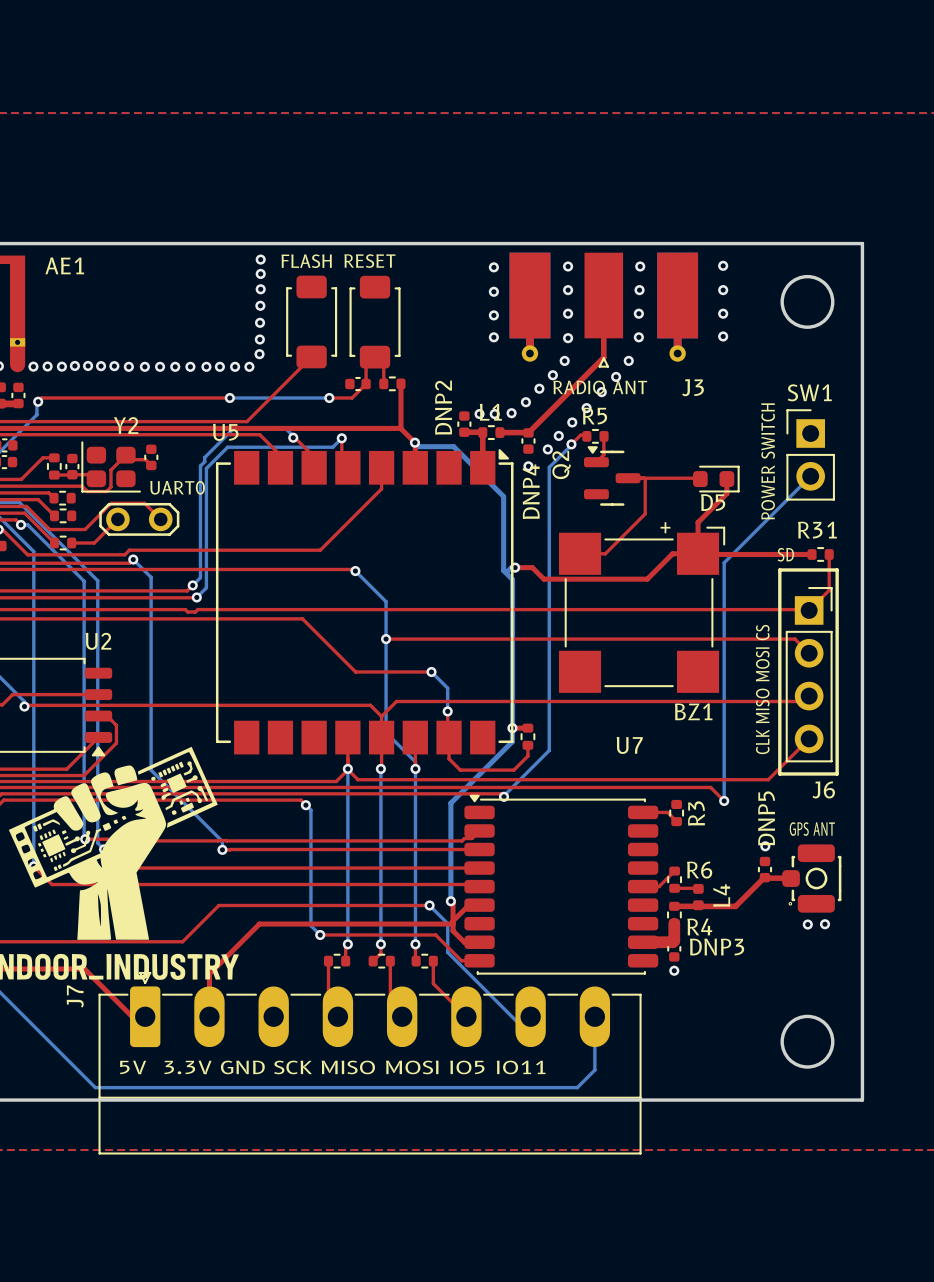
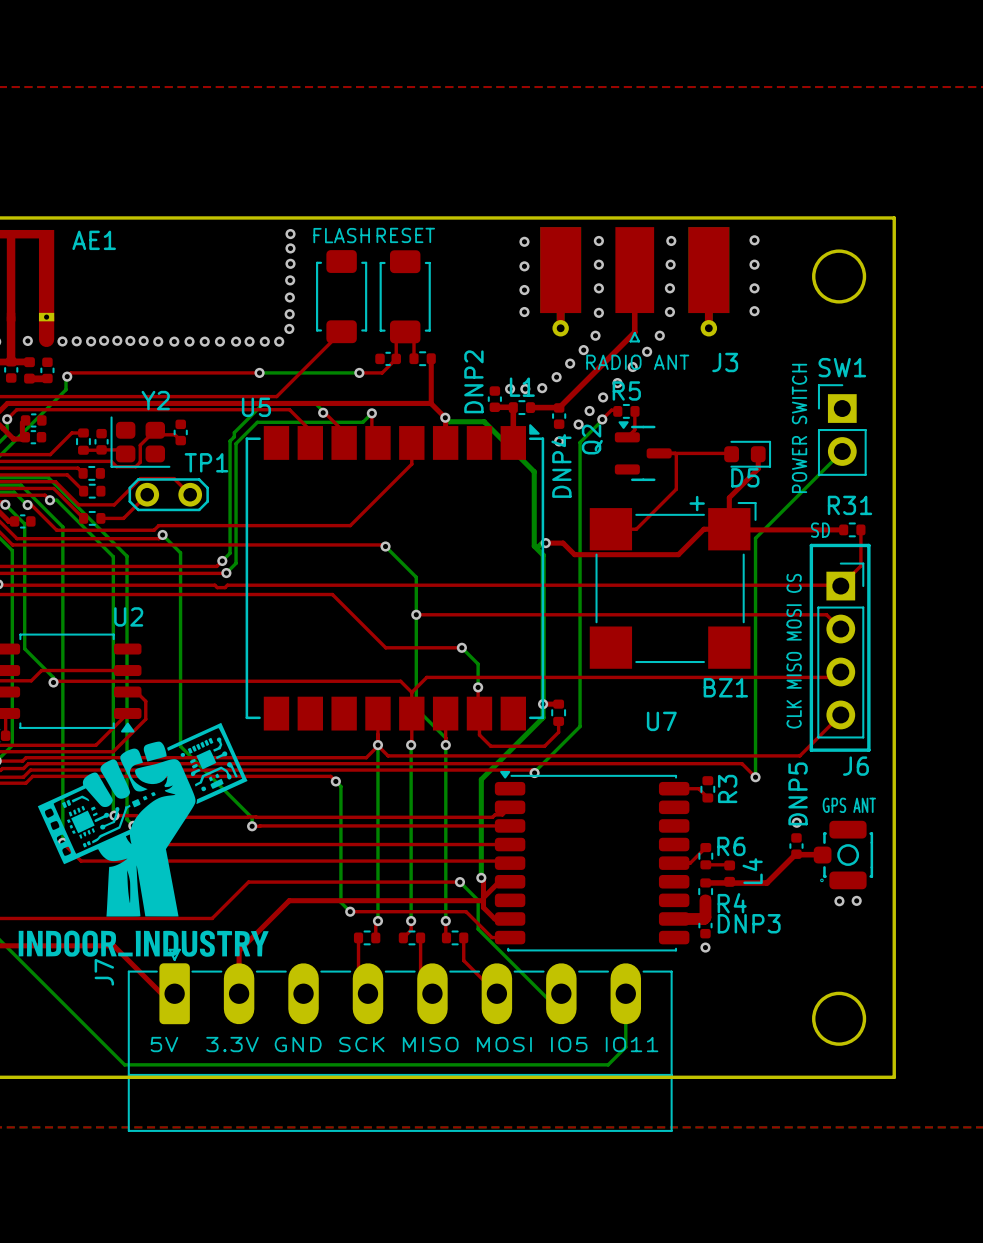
UART0 name: UART0 (177, 487) -> TP1 (206, 462)

